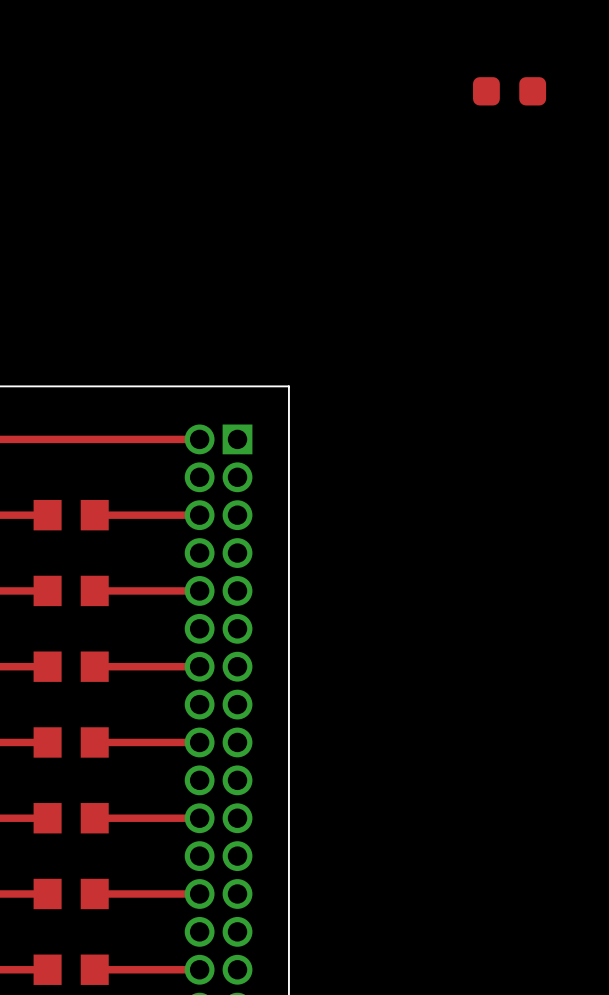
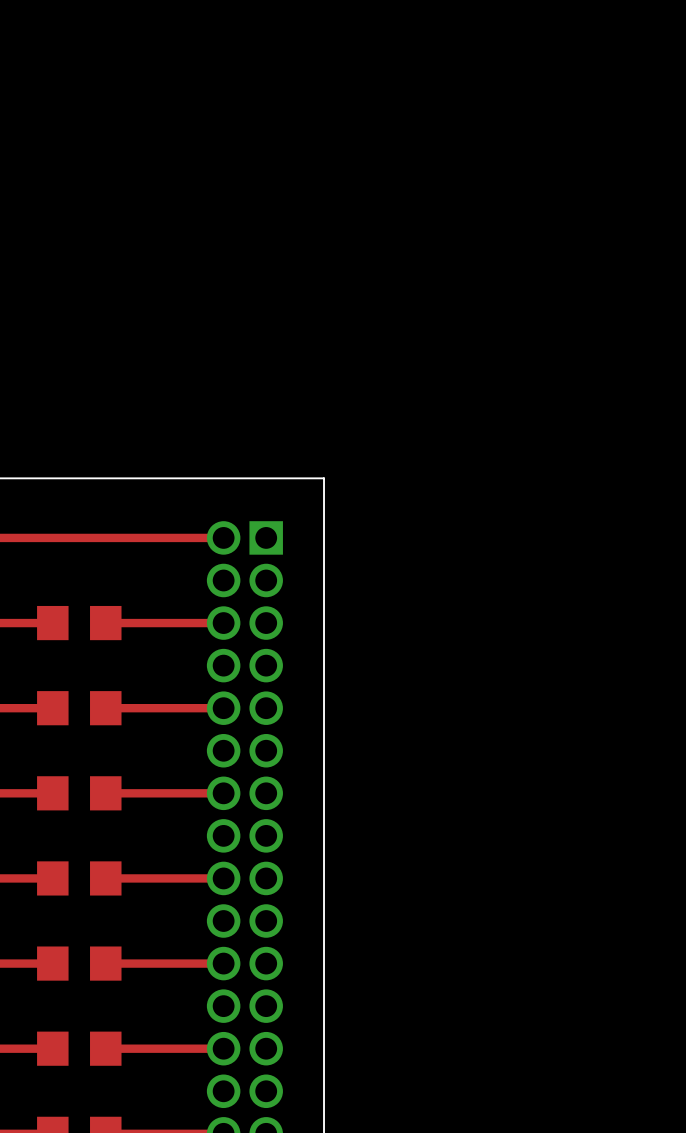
part: (509, 91) -> none

